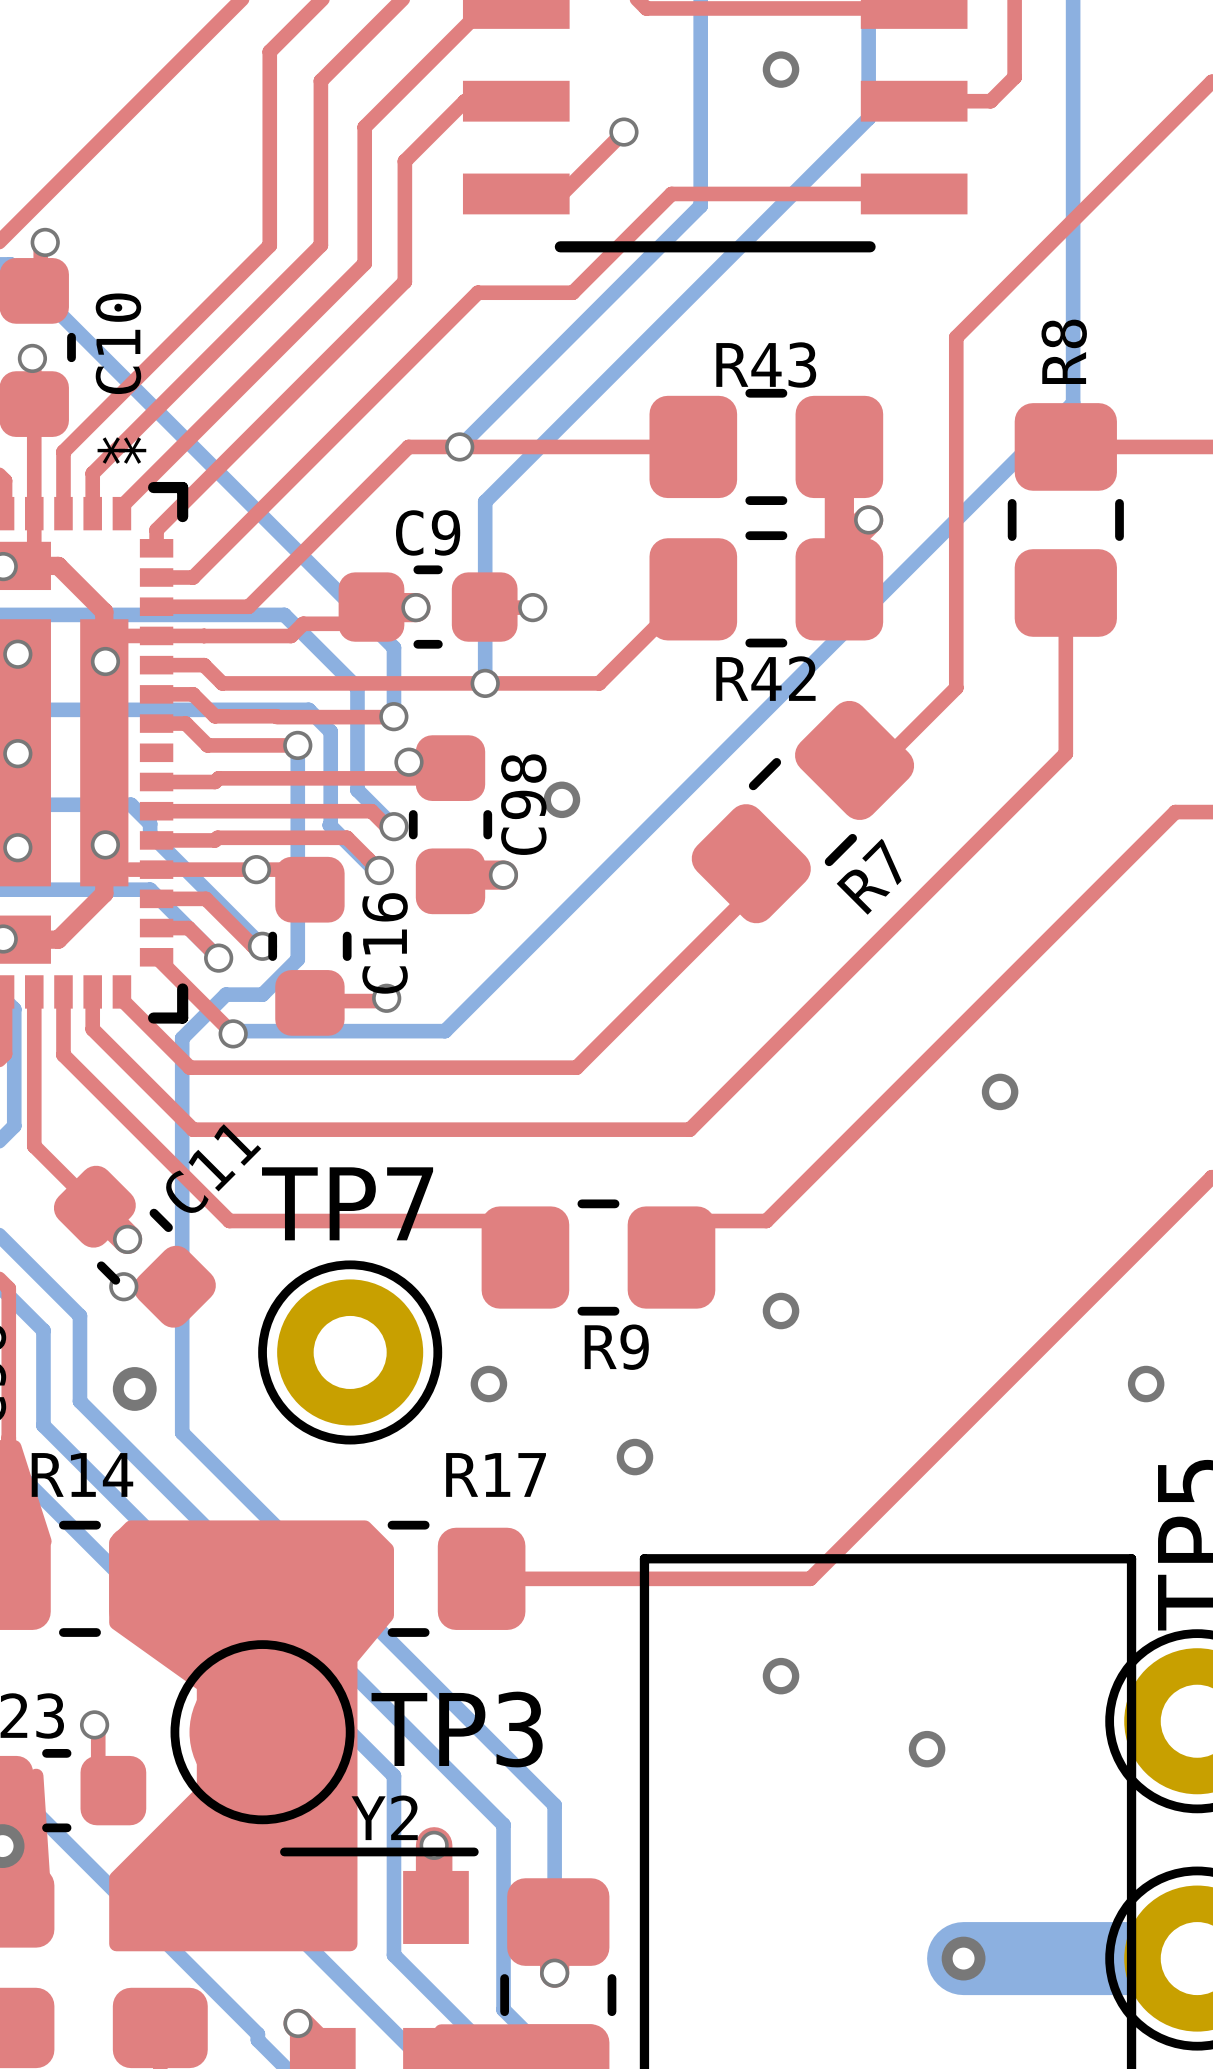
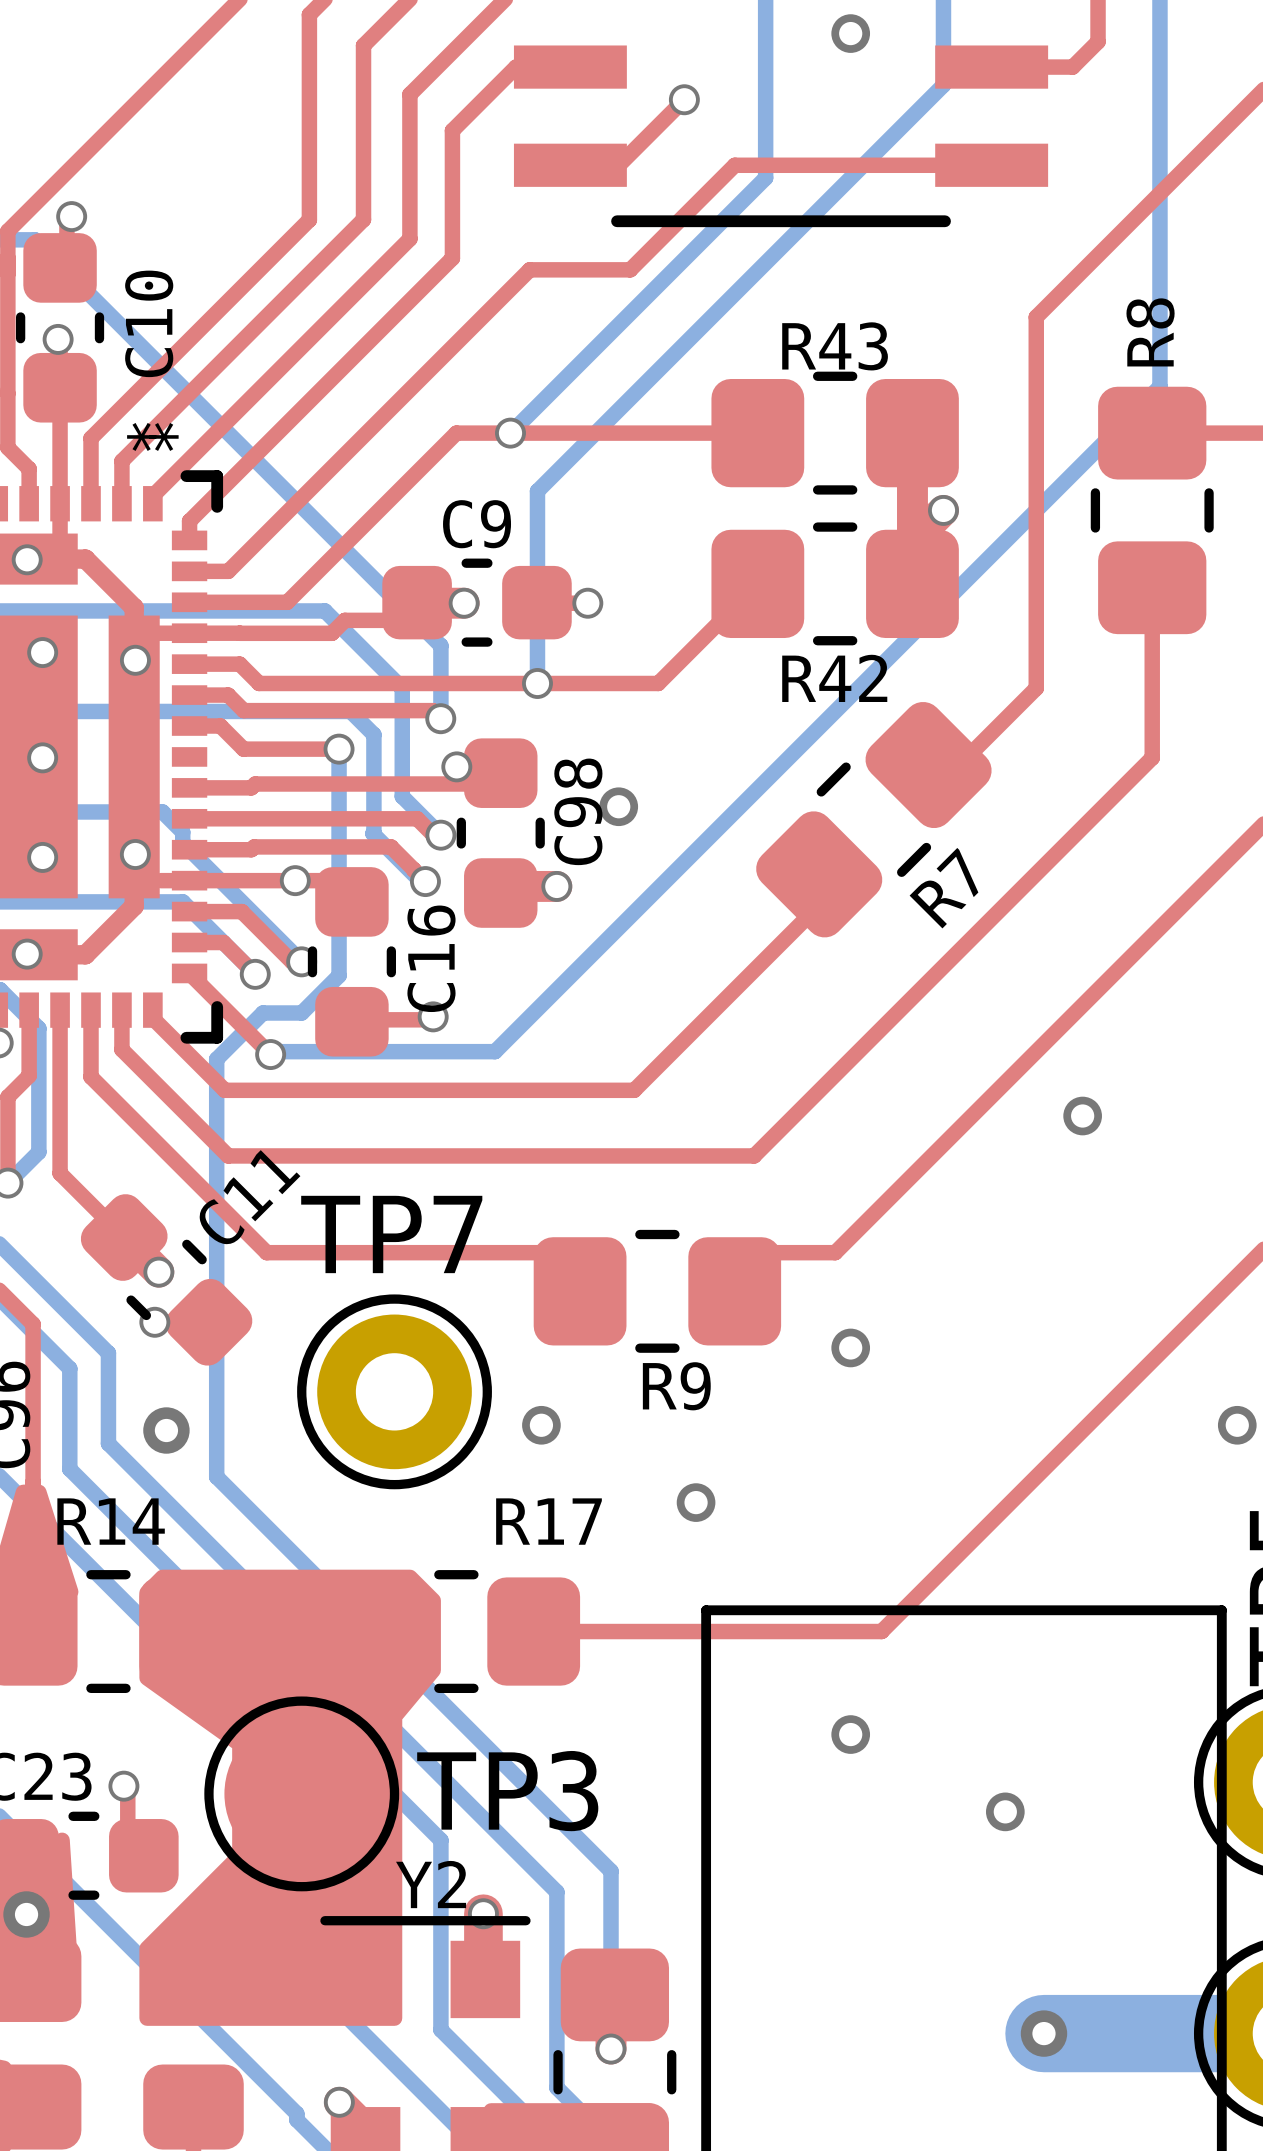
top track: (207, 709) (214, 716) (276, 716) -> none
top track: (277, 717) (393, 717) -> (243, 710) (432, 710) (440, 718)

